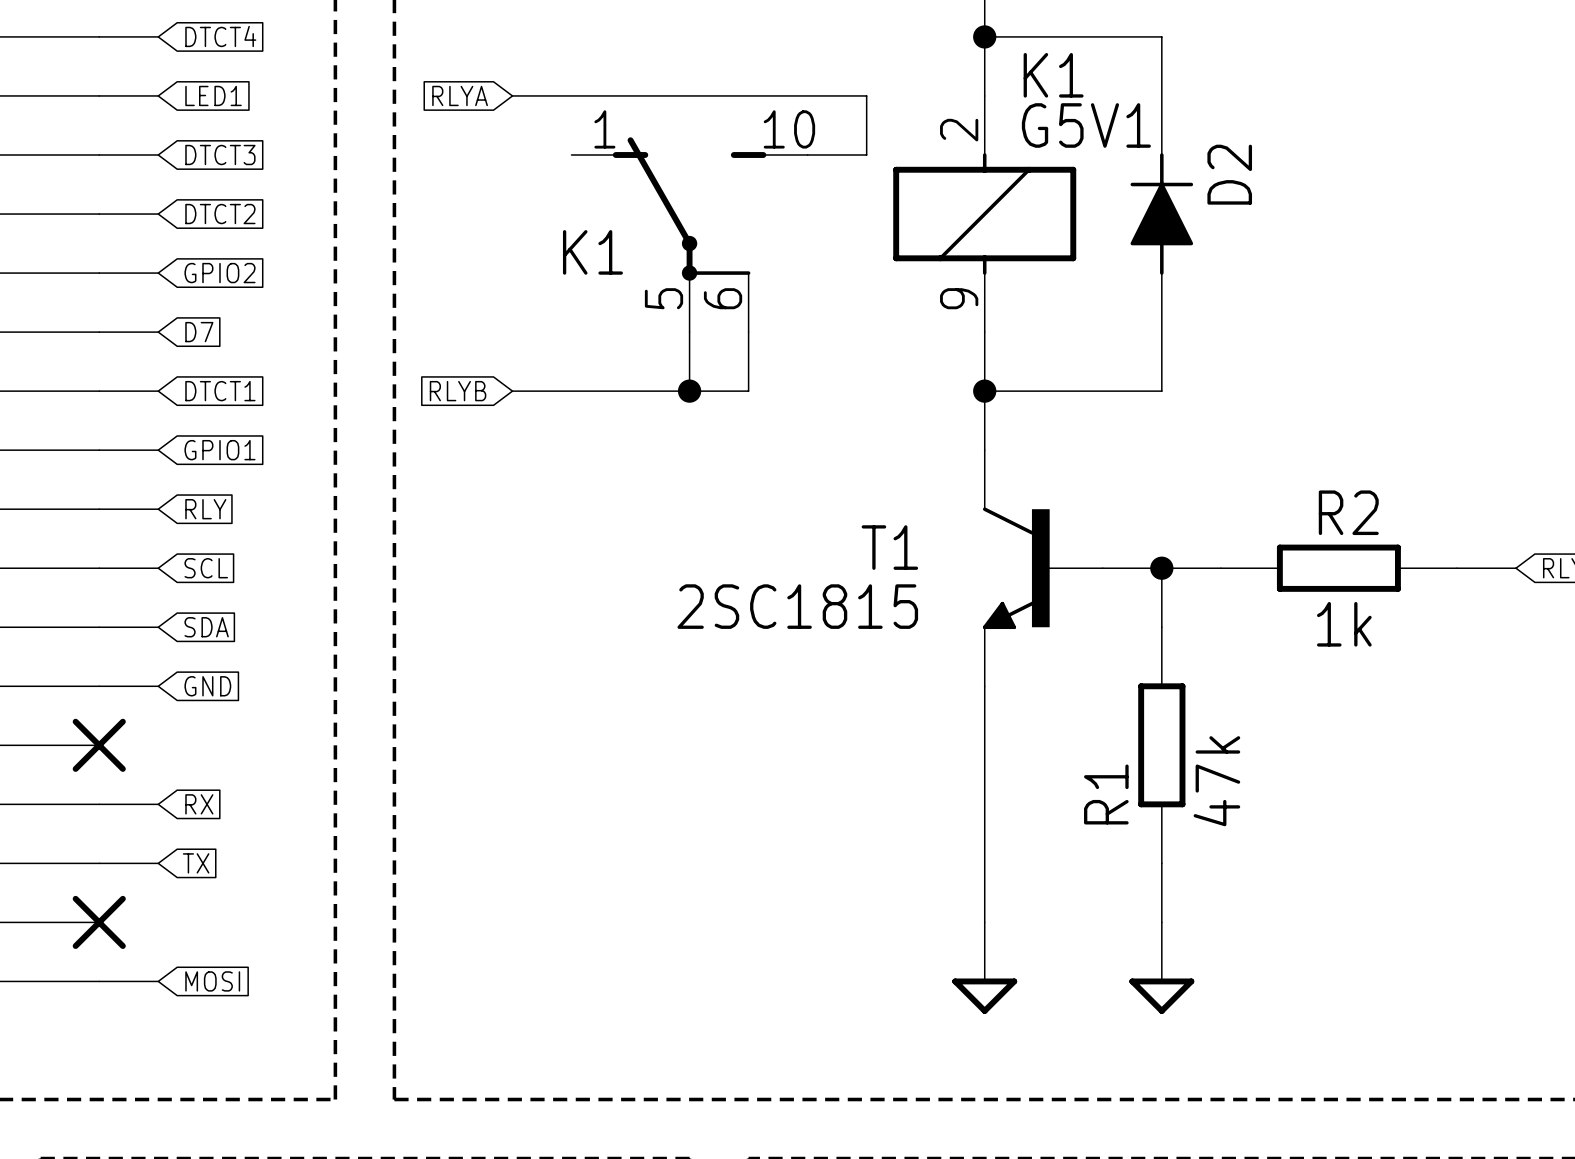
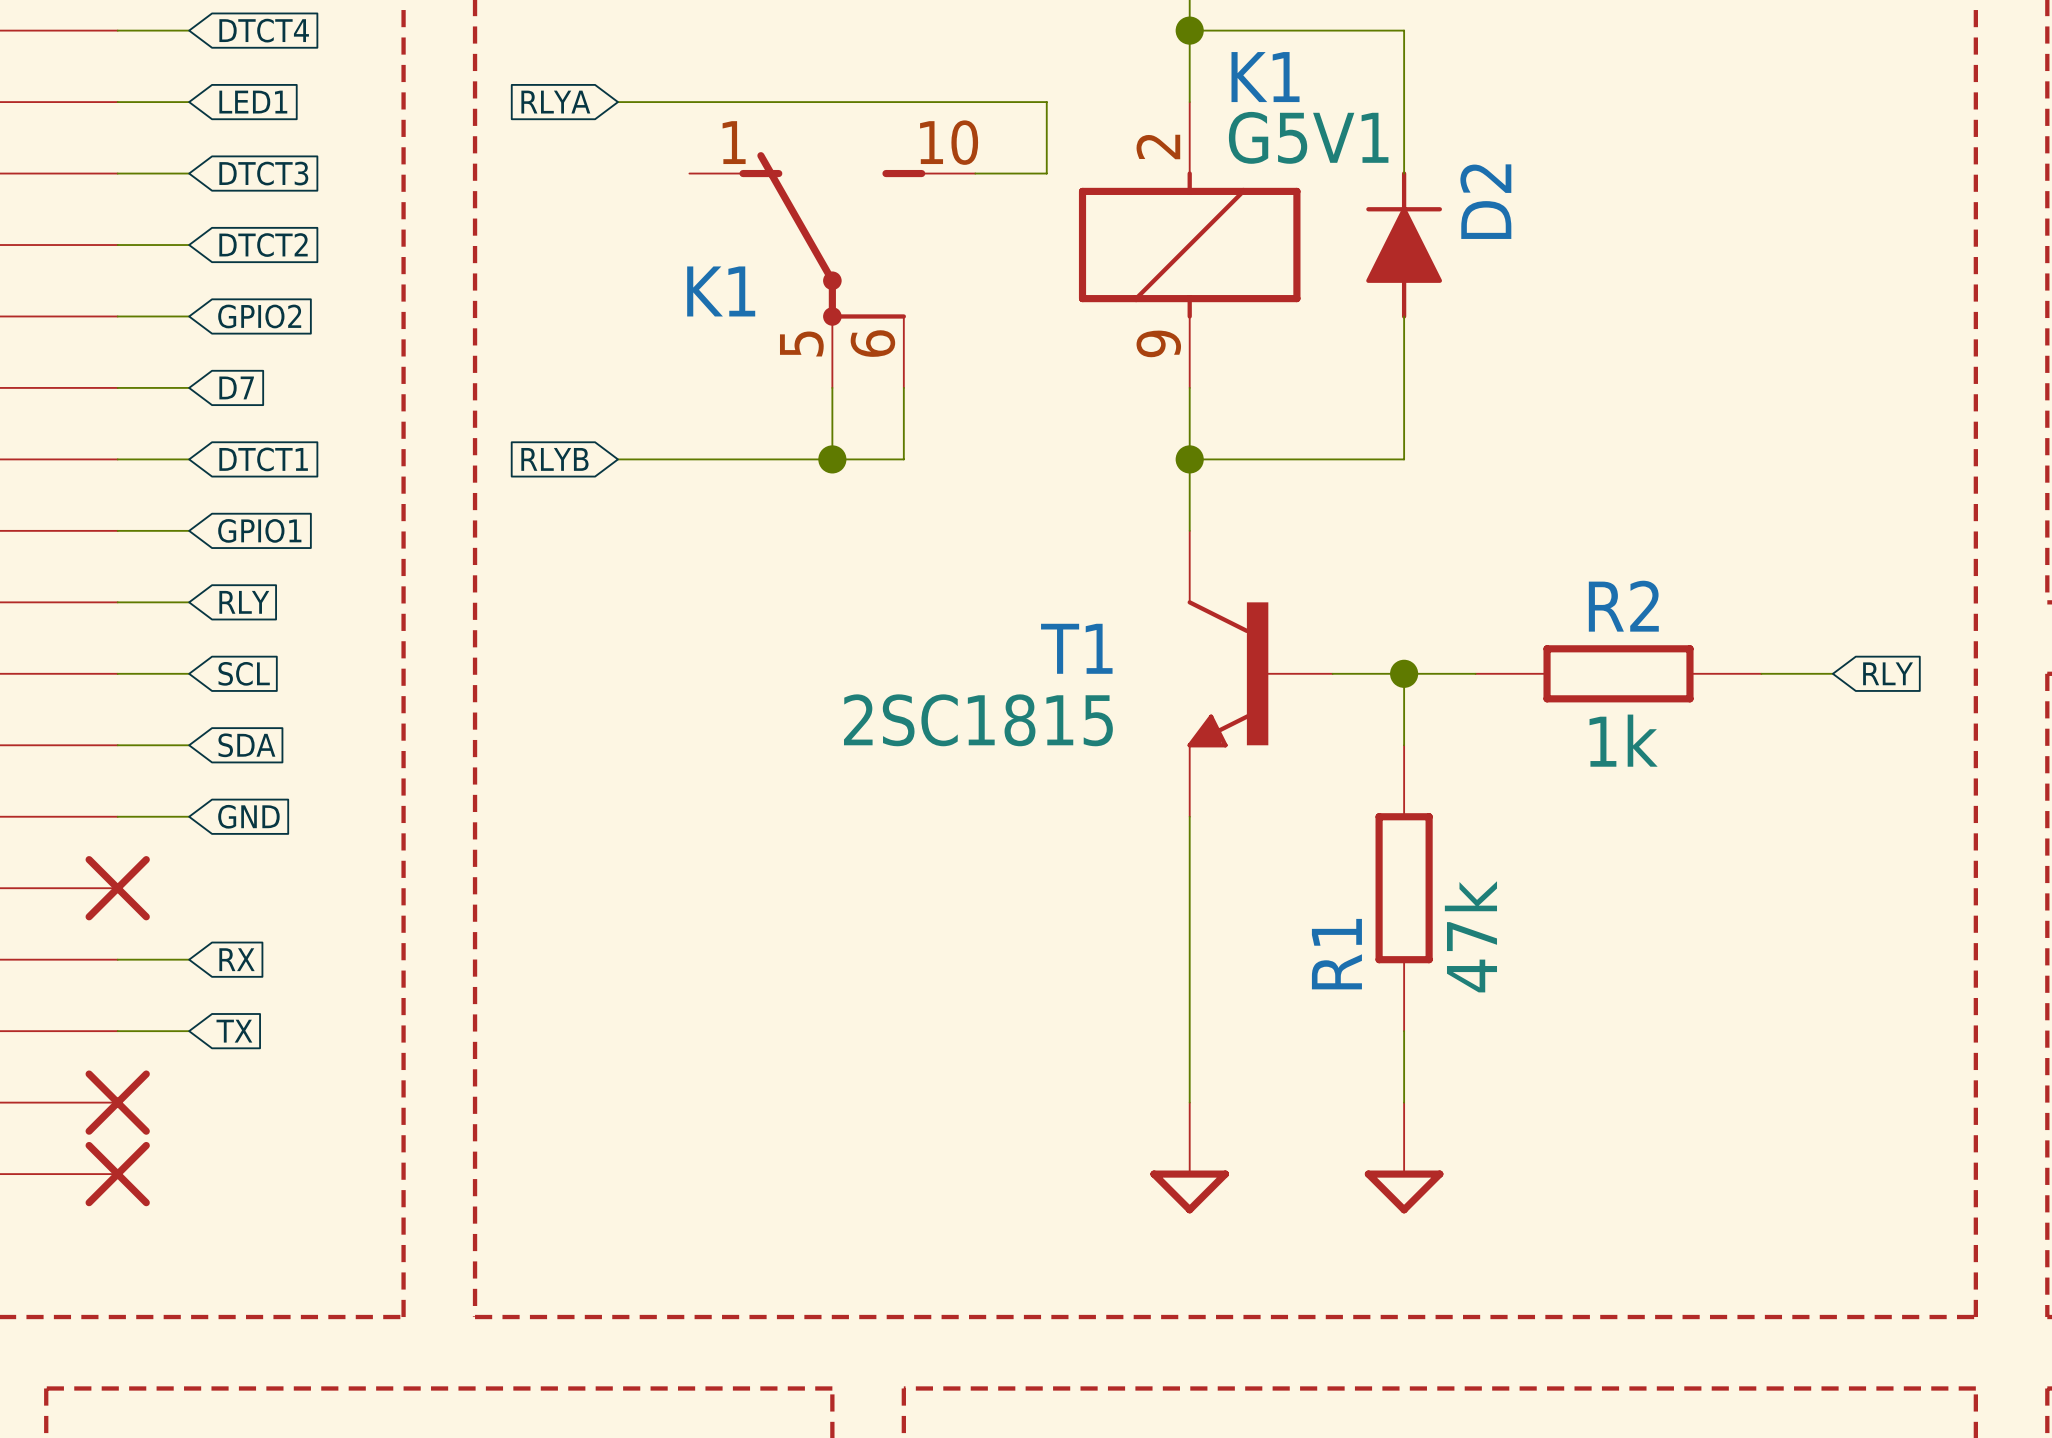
wire: (99, 981) (158, 981) -> none
part: none -> (117, 1174)
global label: MOSI (212, 981) -> none

